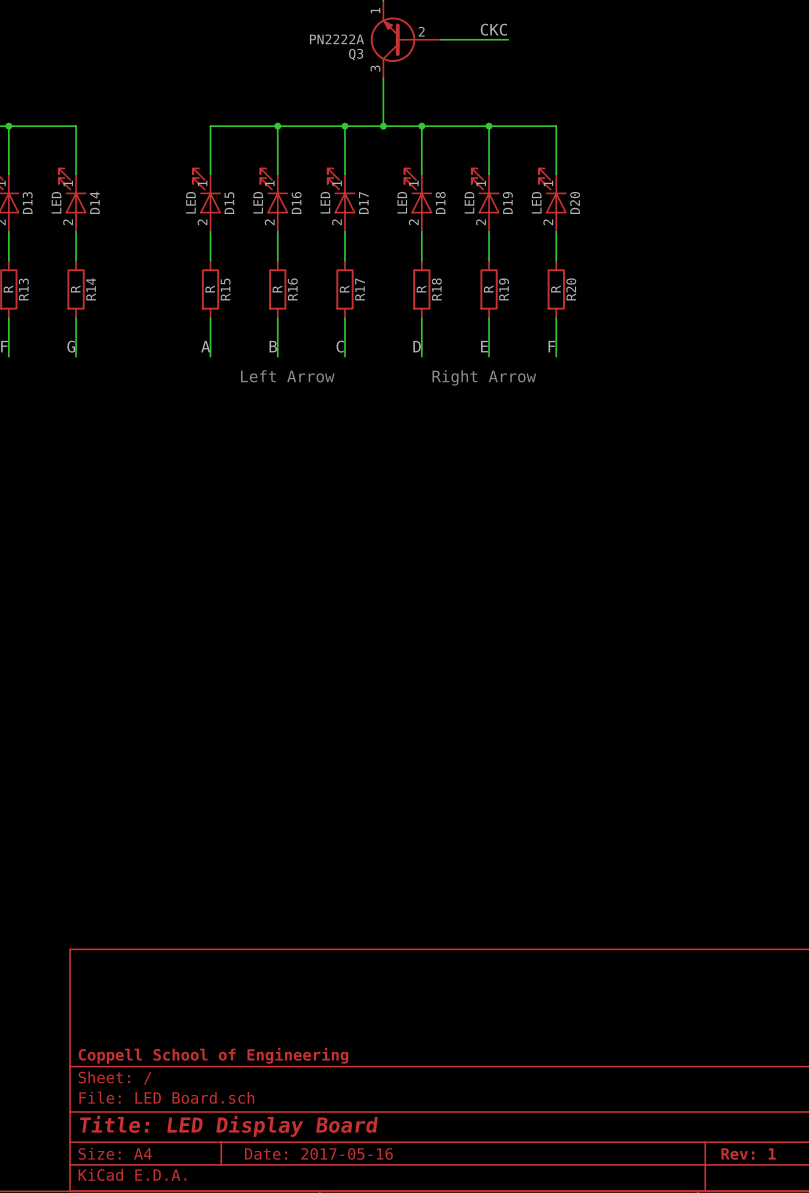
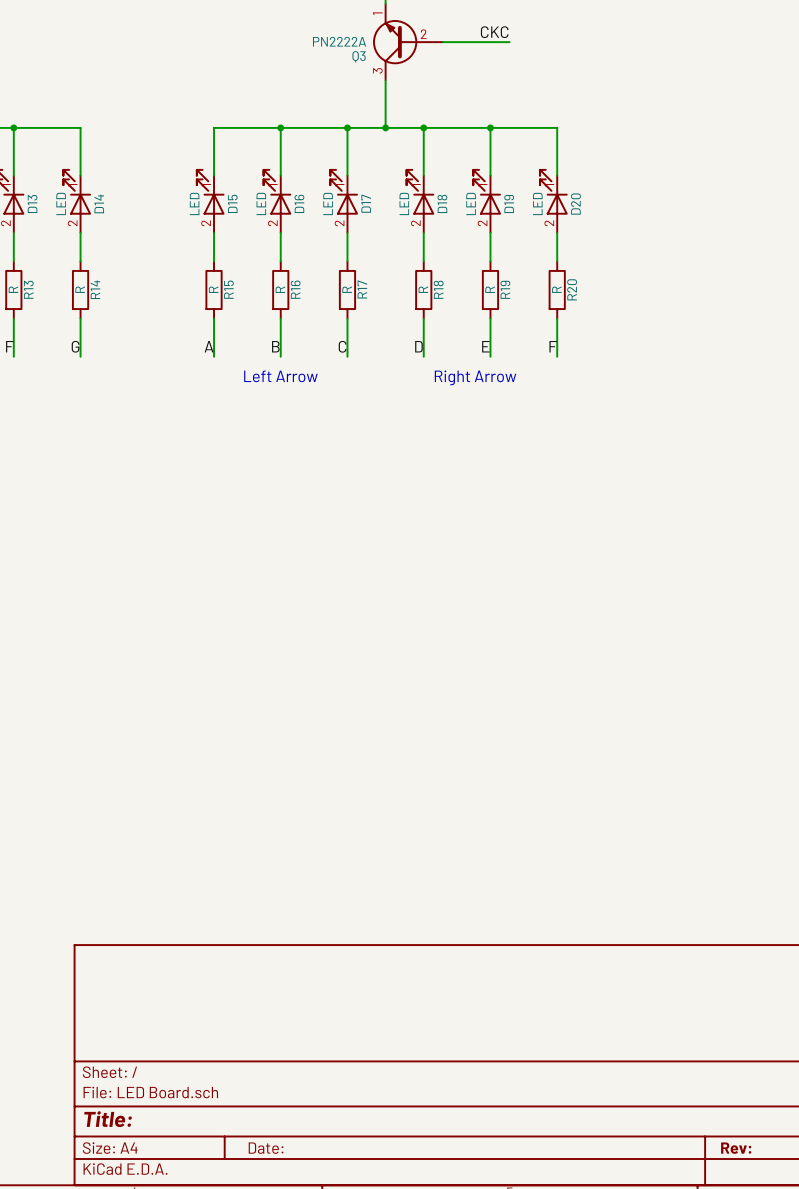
title block: Coppell School of Engineering (213, 1055) -> none
title block: Title: LED Display Board (228, 1126) -> Title: (108, 1119)
title block: Date: 2017-05-16 (318, 1153) -> Date: (266, 1148)
title block: Rev: 1 (748, 1154) -> Rev: (736, 1148)

